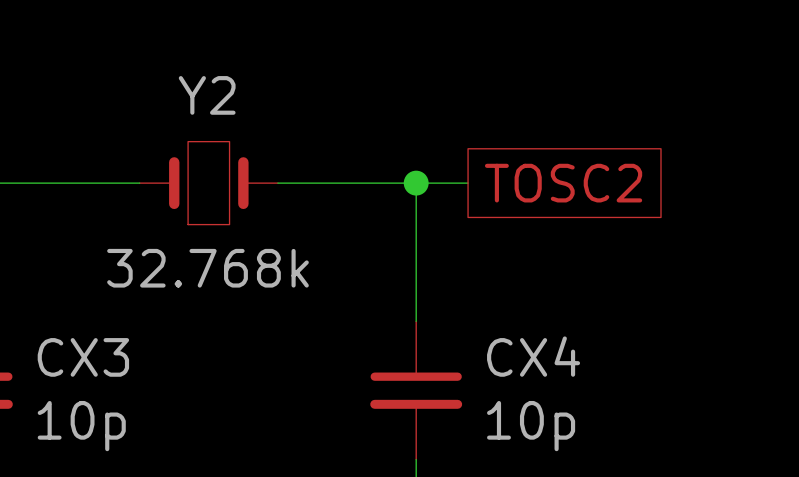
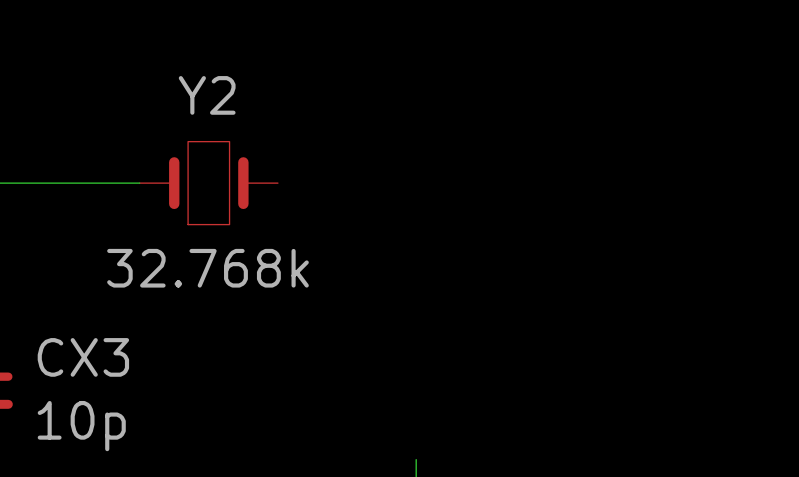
wire: (277, 183) (468, 183) -> none
wire: (416, 183) (416, 321) -> none
junction: (416, 183) -> none
global label: TOSC2 (563, 183) -> none
CX4: 10p (416, 390) -> none

